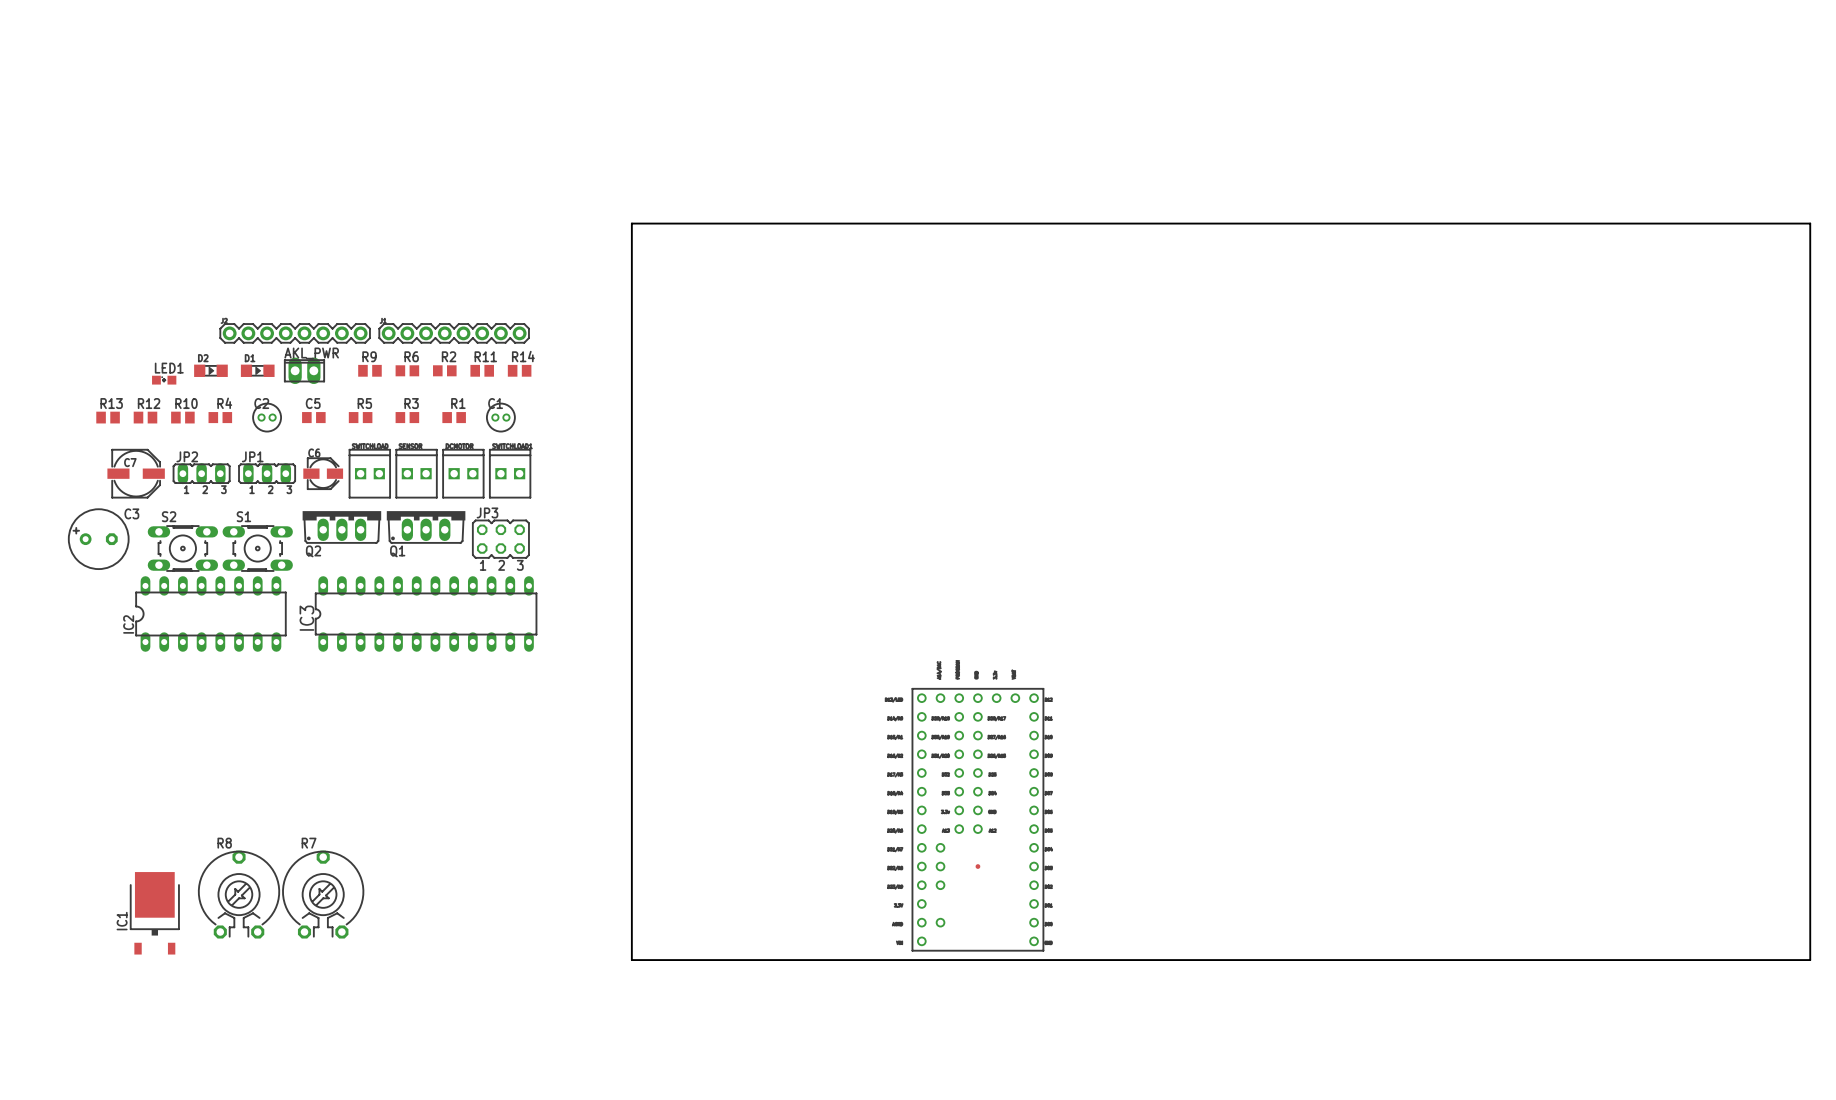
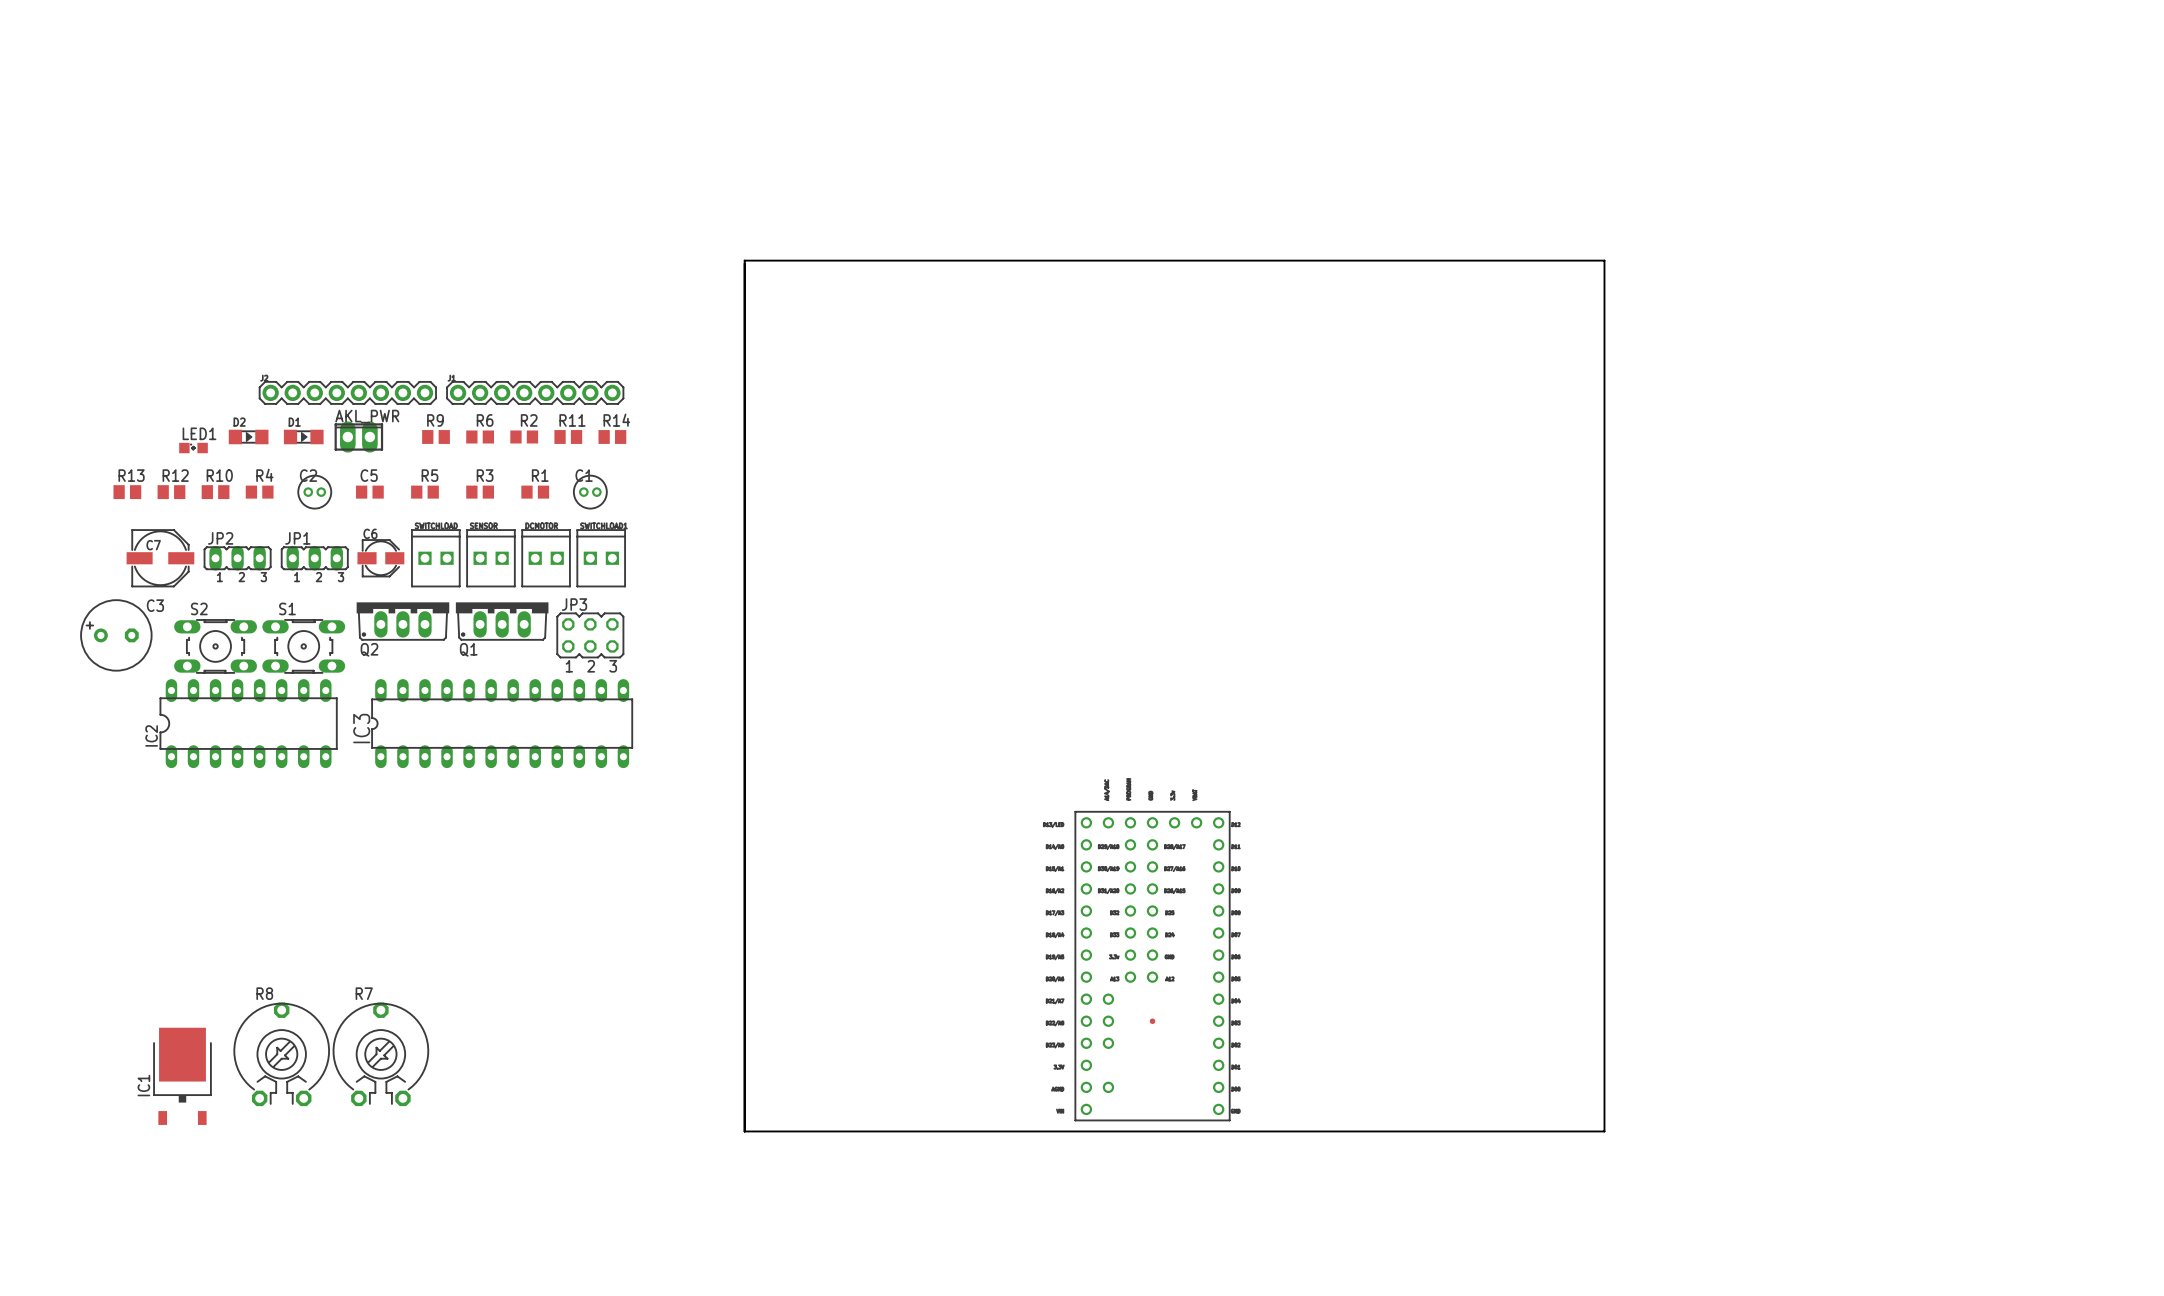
board edge: (631, 223) (1810, 223) (1810, 960) (1361, 960) -> (744, 1131) (744, 260) (1604, 260) (1604, 1131)

